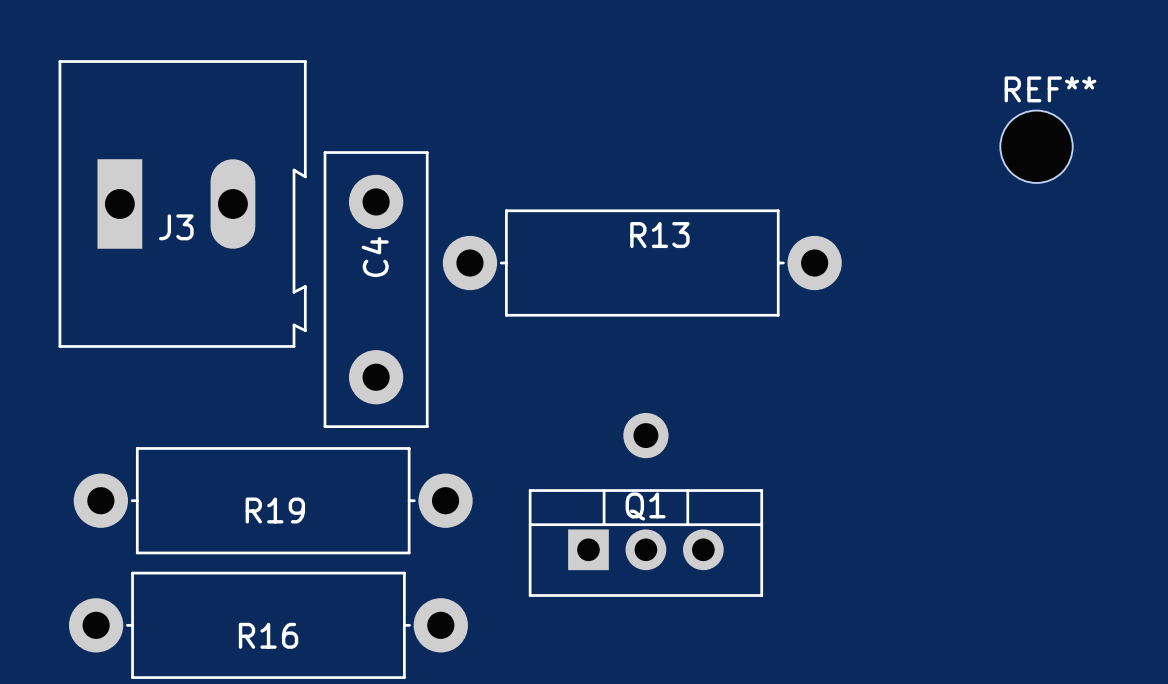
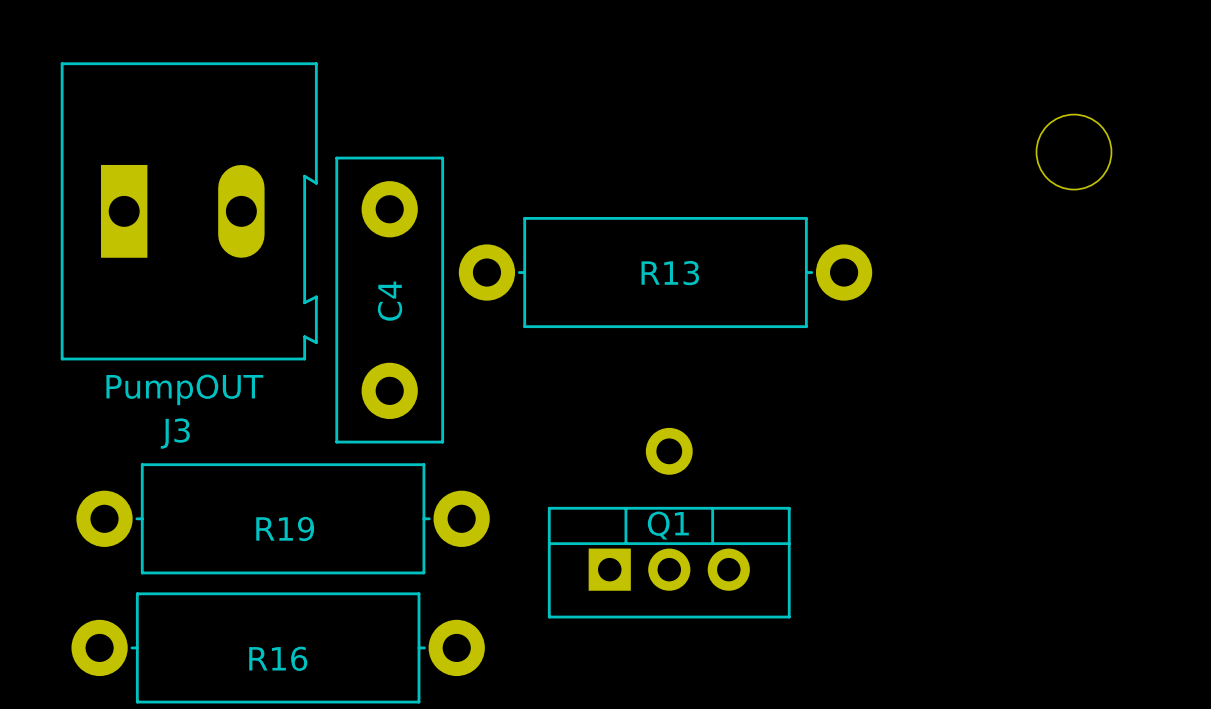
REF** name: REF** (1050, 89) -> none
J3 name position: J3 (176, 227) -> J3 (175, 433)
R13 name position: R13 (659, 235) -> R13 (670, 273)
C4 name position: C4 (375, 257) -> C4 (390, 301)
J3 value: none -> PumpOUT (184, 389)

